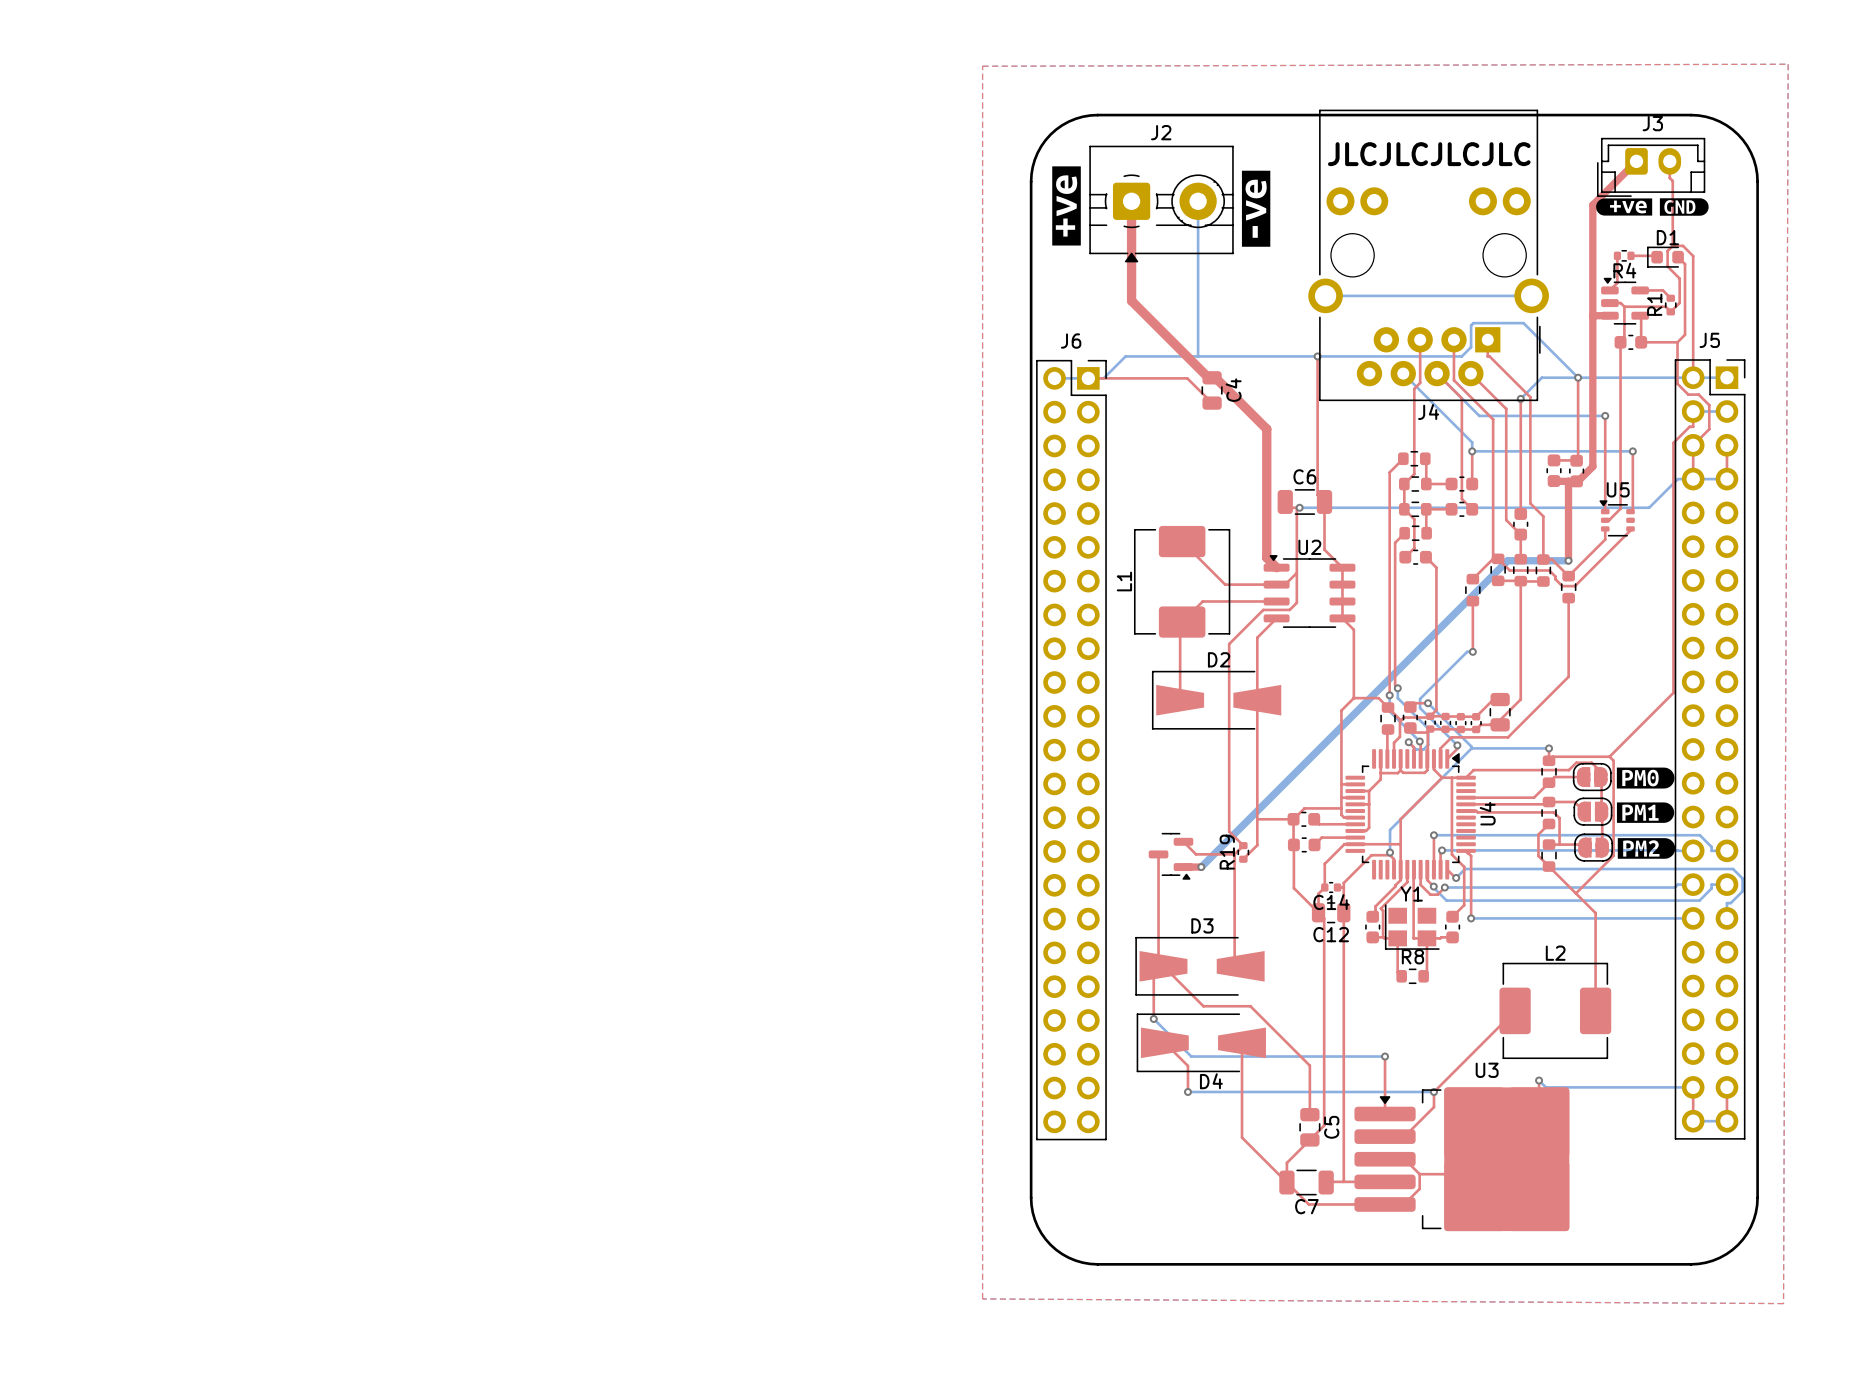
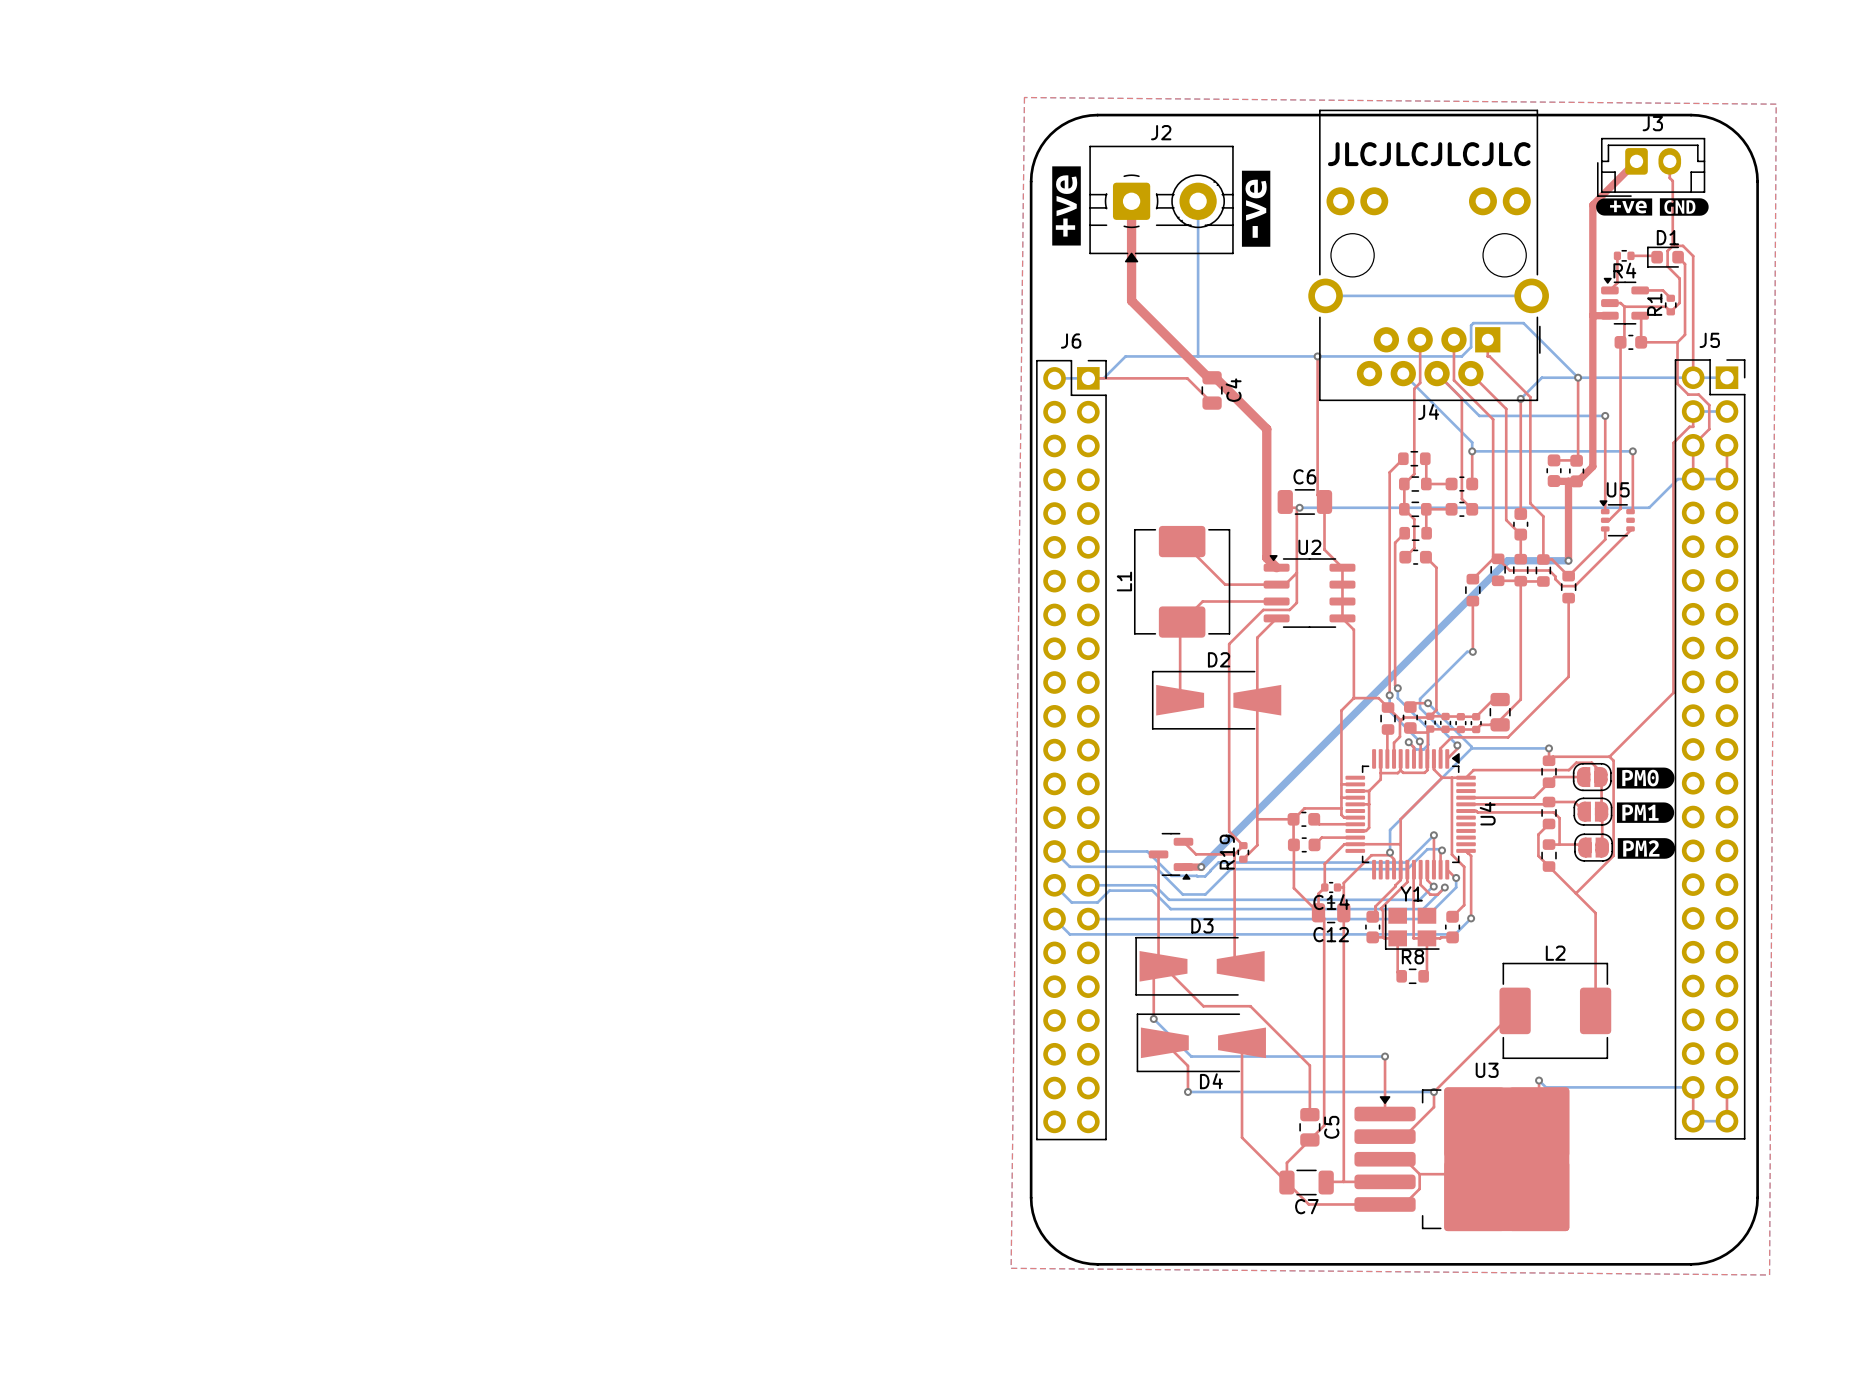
top zone outline: (1788, 64) (982, 66) (982, 1298) (1783, 1303) (1788, 64) -> (1024, 97) (1011, 1268) (1769, 1274) (1776, 104) (1024, 97)
bottom track: (1433, 835) (1699, 835) (1711, 847) (1711, 850) (1726, 850) -> (1433, 835) (1406, 862) (1218, 862) (1205, 876) (1171, 875) (1147, 851) (1088, 851)
bottom track: (1442, 850) (1693, 850) -> (1442, 850) (1427, 849) (1407, 869) (1230, 869) (1205, 894) (1182, 894) (1155, 866) (1069, 866) (1054, 851)
bottom track: (1456, 877) (1465, 869) (1733, 869) (1742, 878) (1742, 891) (1730, 903) (1726, 903) (1726, 918) -> (1456, 877) (1456, 887) (1424, 919) (1088, 919)
bottom track: (1693, 884) (1677, 884) (1674, 887) (1444, 887) -> (1054, 885) (1071, 902) (1097, 902) (1109, 890) (1152, 890) (1170, 909) (1423, 909) (1444, 887)
bottom track: (1726, 884) (1711, 884) (1711, 888) (1699, 900) (1446, 900) (1433, 887) -> none
bottom track: none -> (1088, 885) (1154, 885) (1169, 899) (1419, 899) (1433, 886)
bottom track: (1471, 918) (1693, 918) -> (1471, 918) (1455, 934) (1069, 934) (1054, 919)

